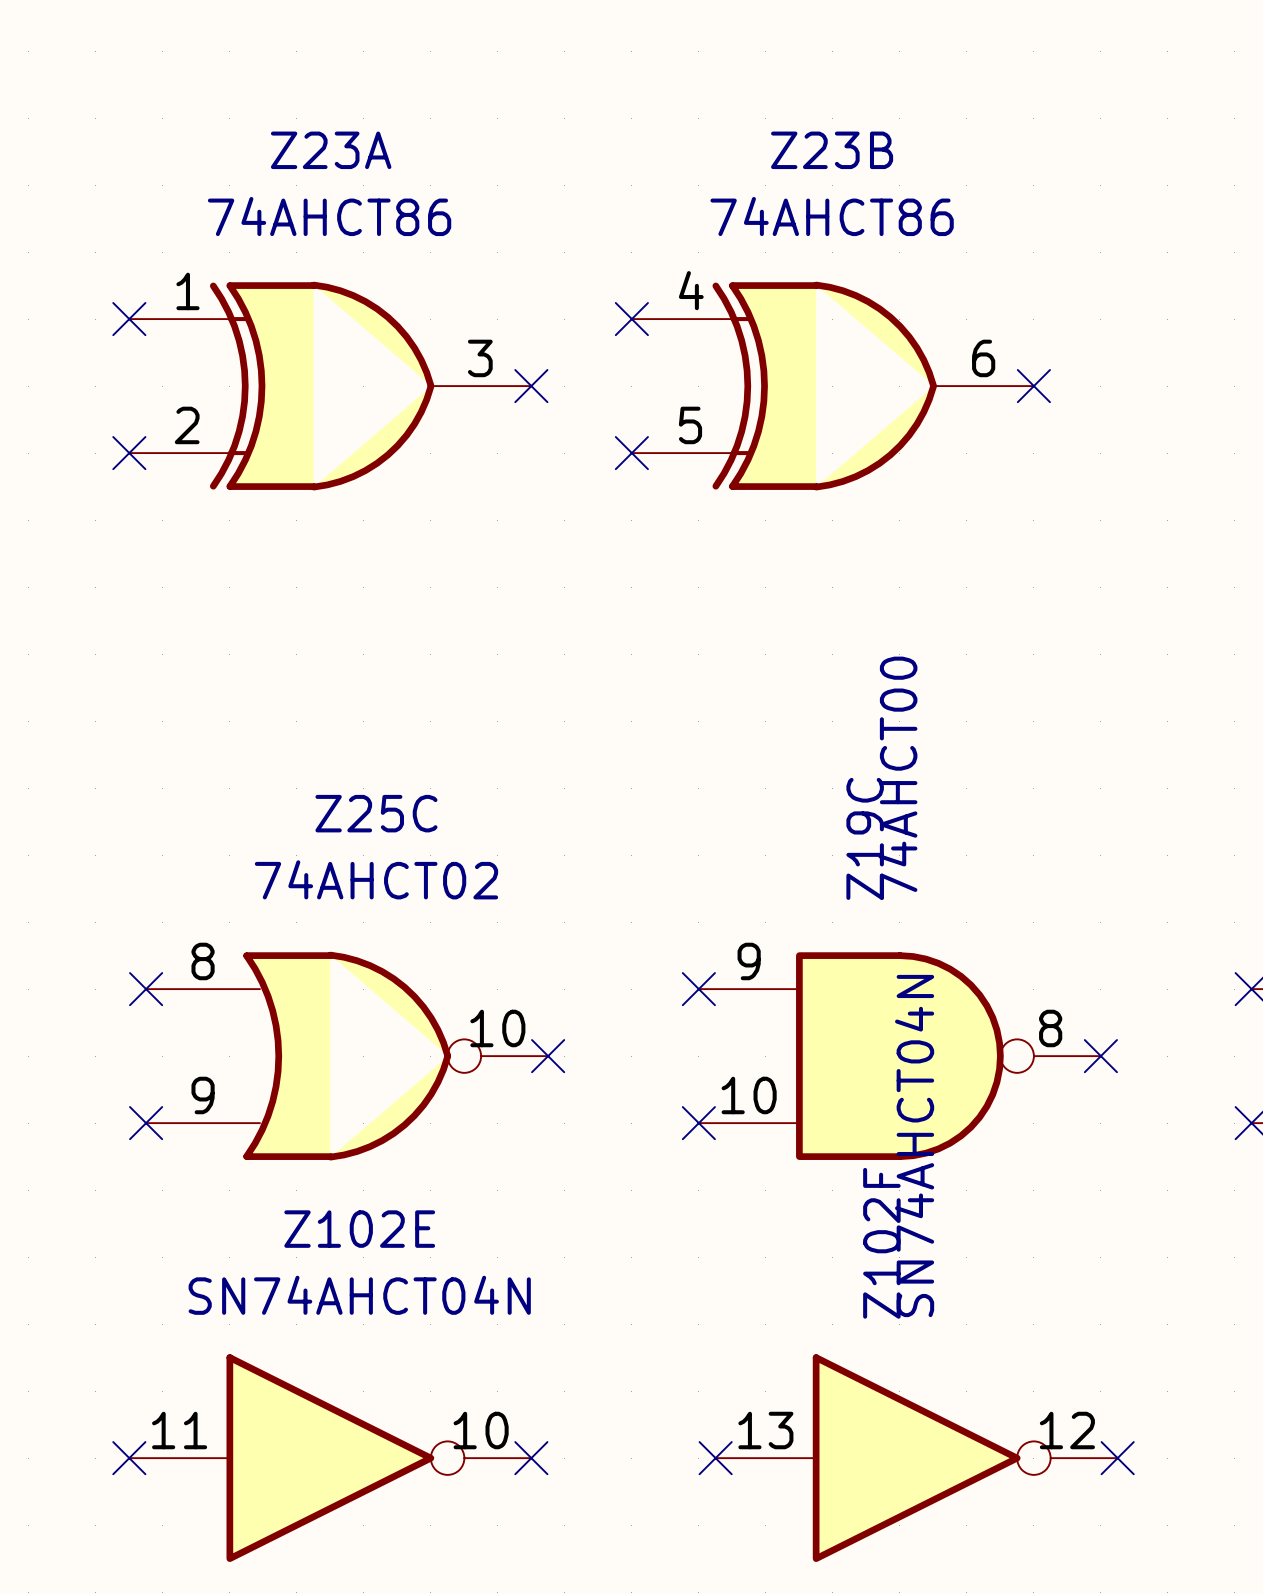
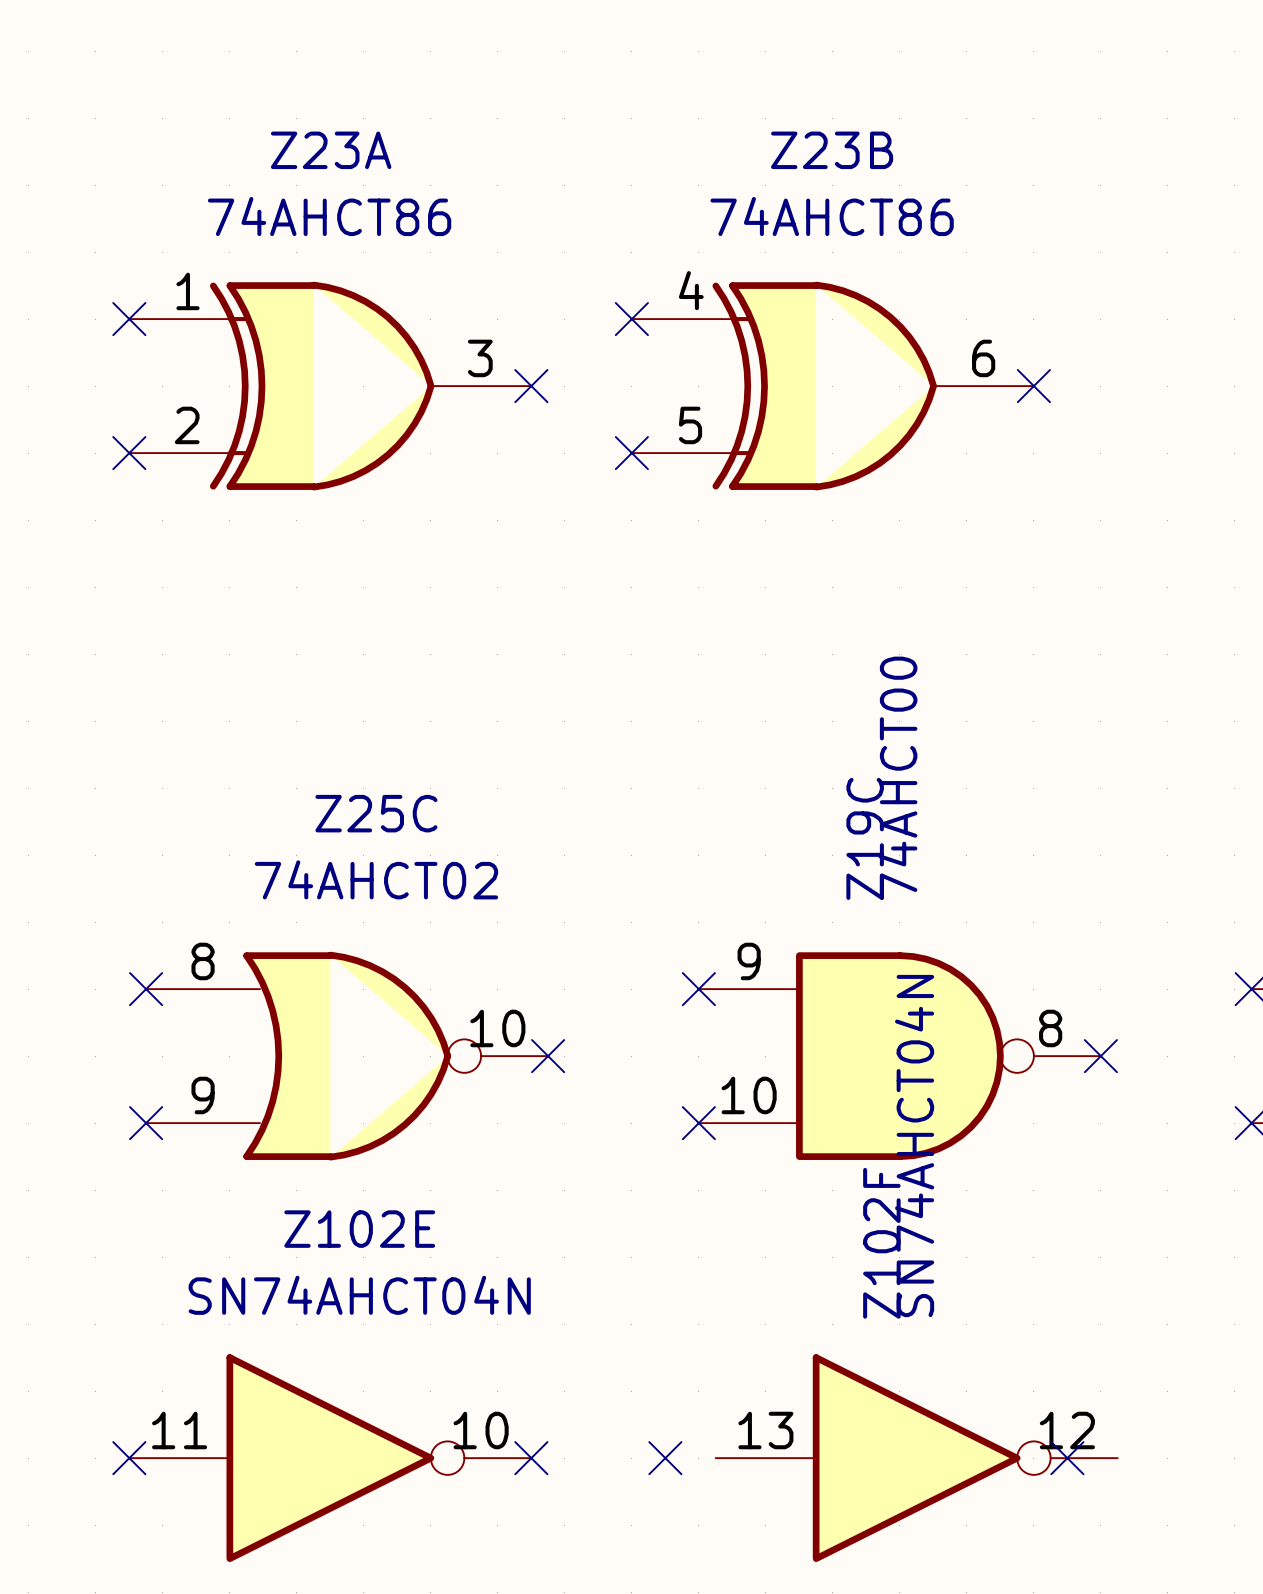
no-connect mark position: (715, 1458) -> (665, 1458)
no-connect mark position: (1117, 1458) -> (1067, 1458)

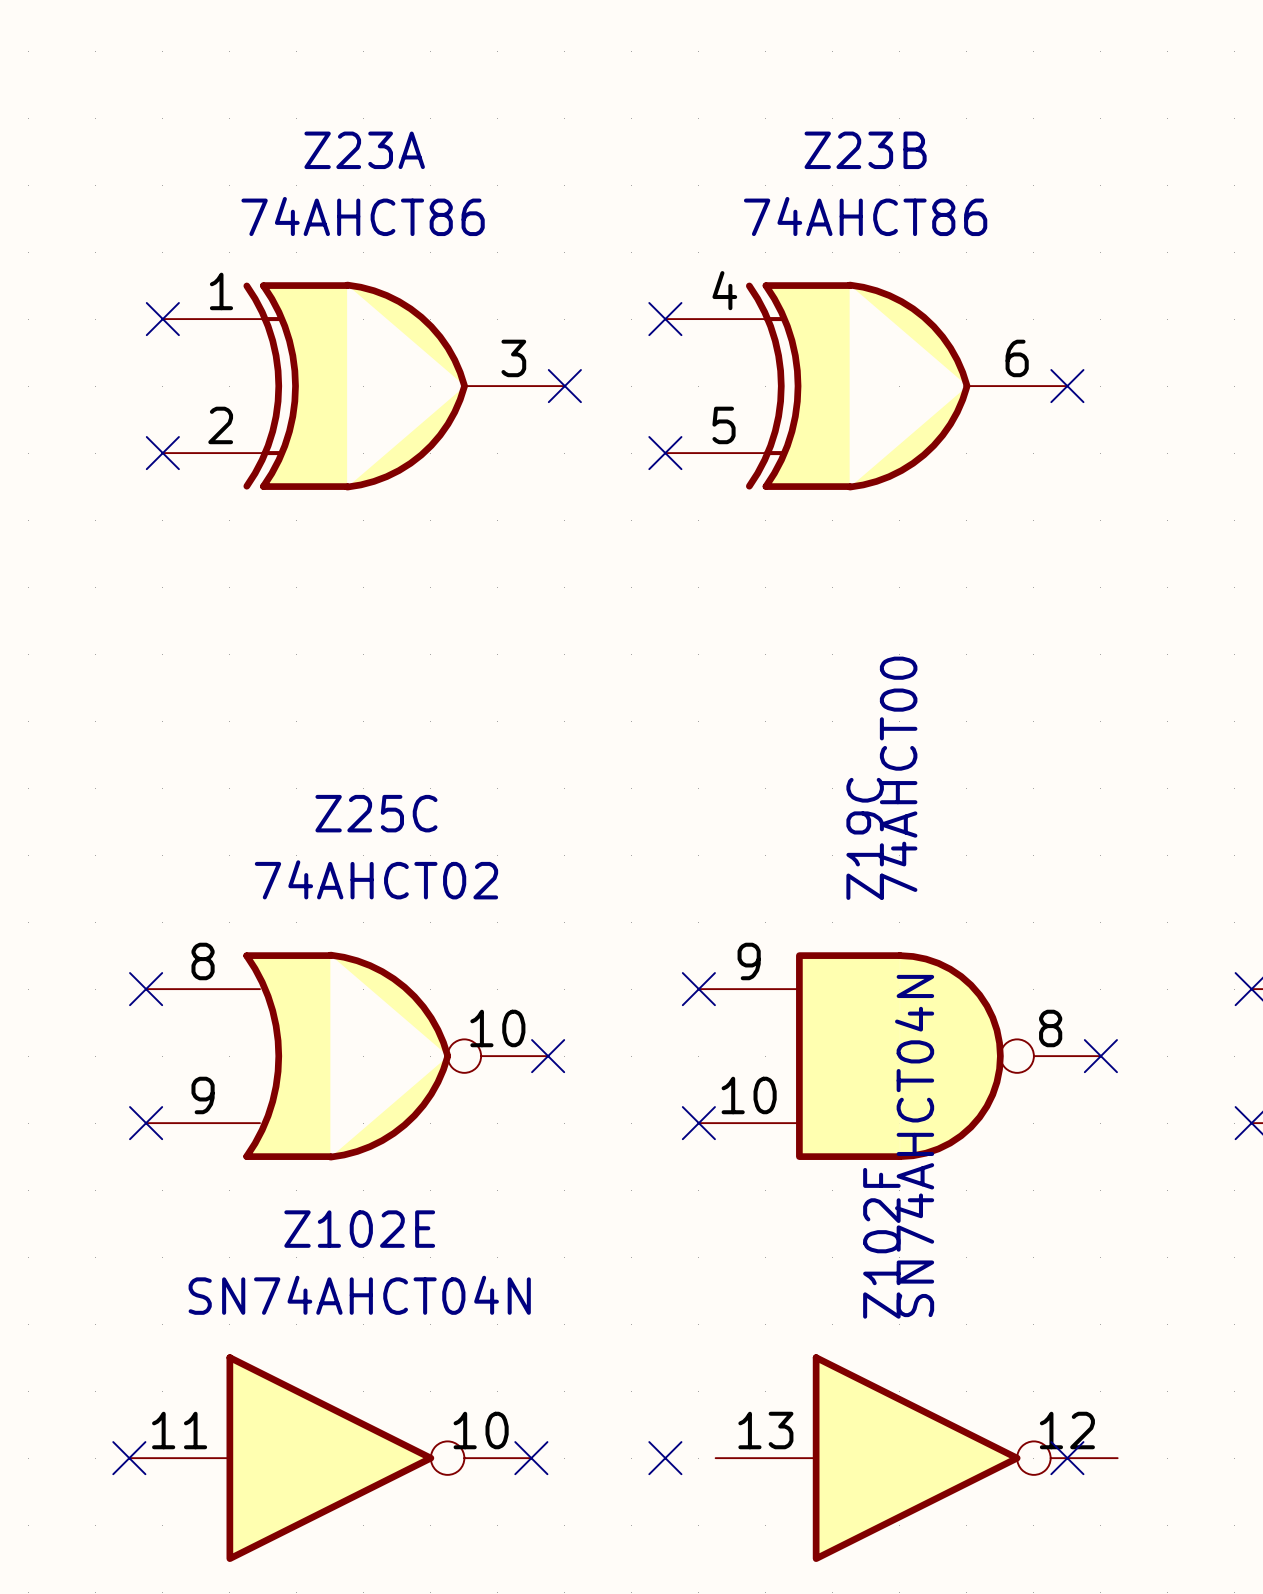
no-connect mark position: (129, 319) -> (162, 319)
no-connect mark position: (631, 319) -> (665, 319)
Z23A position: (330, 386) -> (363, 386)
no-connect mark position: (531, 386) -> (564, 386)
Z23B position: (832, 386) -> (866, 386)
no-connect mark position: (1033, 386) -> (1067, 386)
no-connect mark position: (129, 453) -> (162, 453)
no-connect mark position: (631, 453) -> (665, 453)

